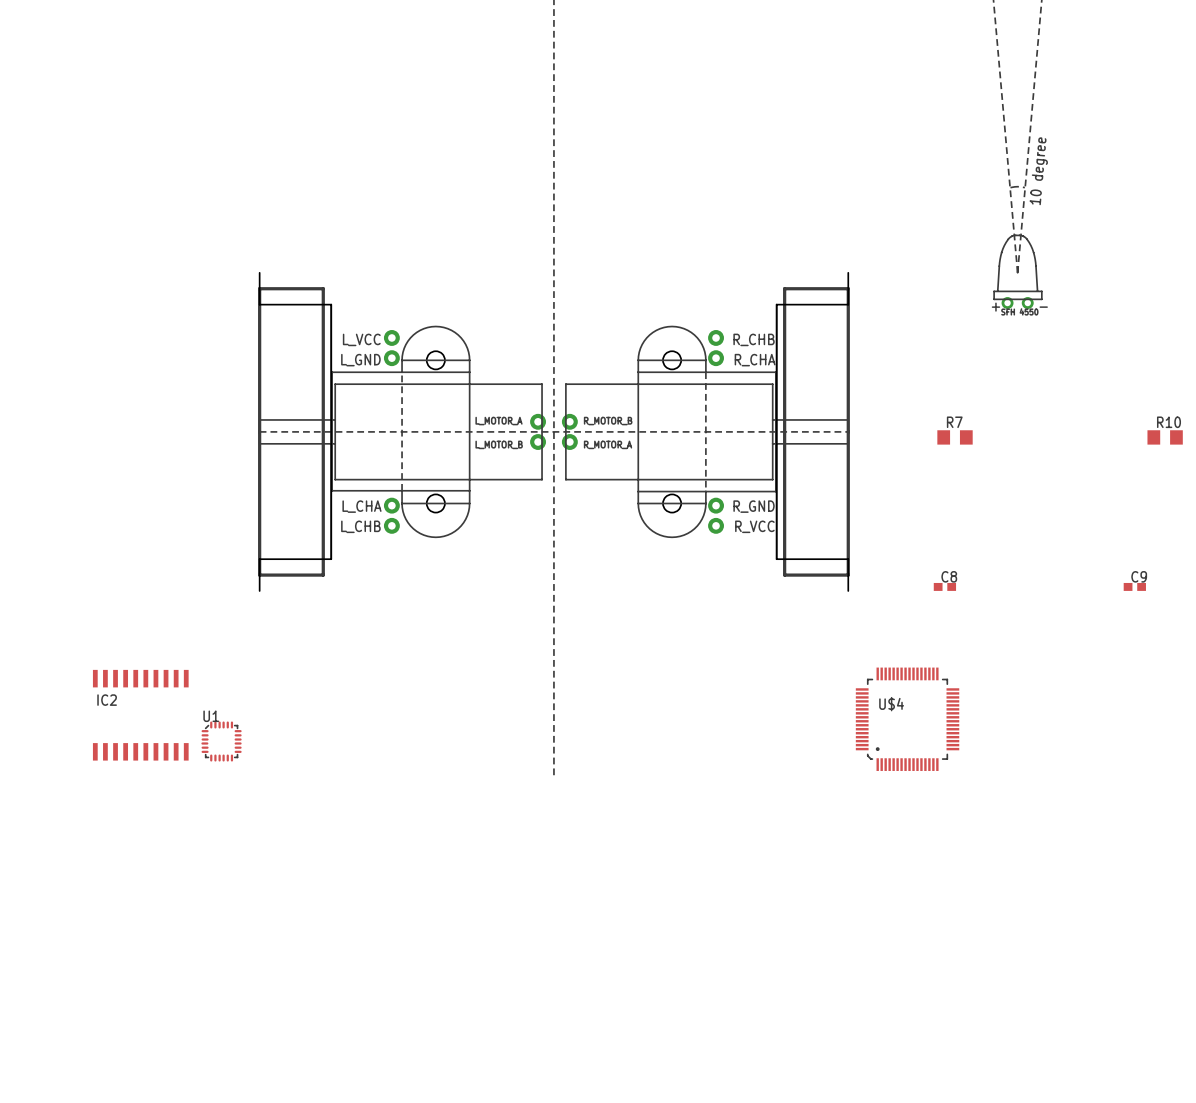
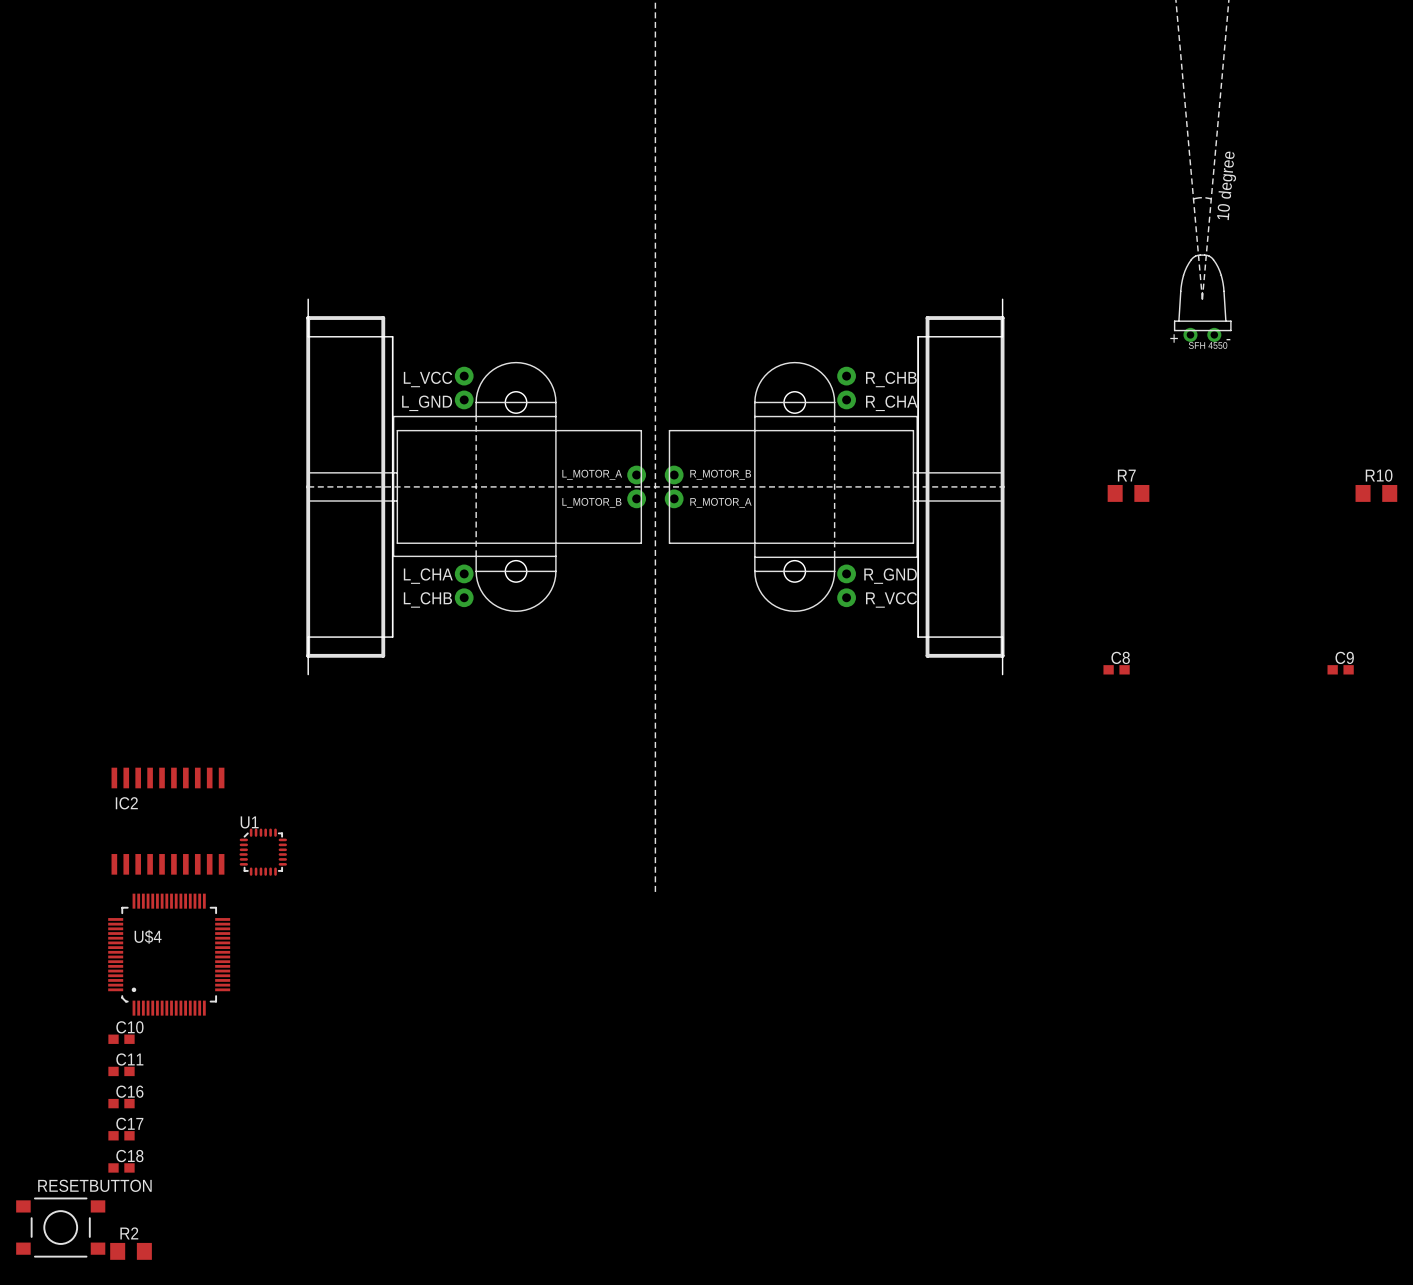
U$4 position: (907, 719) -> (169, 954)
C10: none -> (121, 1039)
C11: none -> (121, 1071)
C16: none -> (121, 1103)
C17: none -> (121, 1135)
C18: none -> (121, 1167)
RESETBUTTON: none -> (60, 1227)
R2: none -> (131, 1251)

